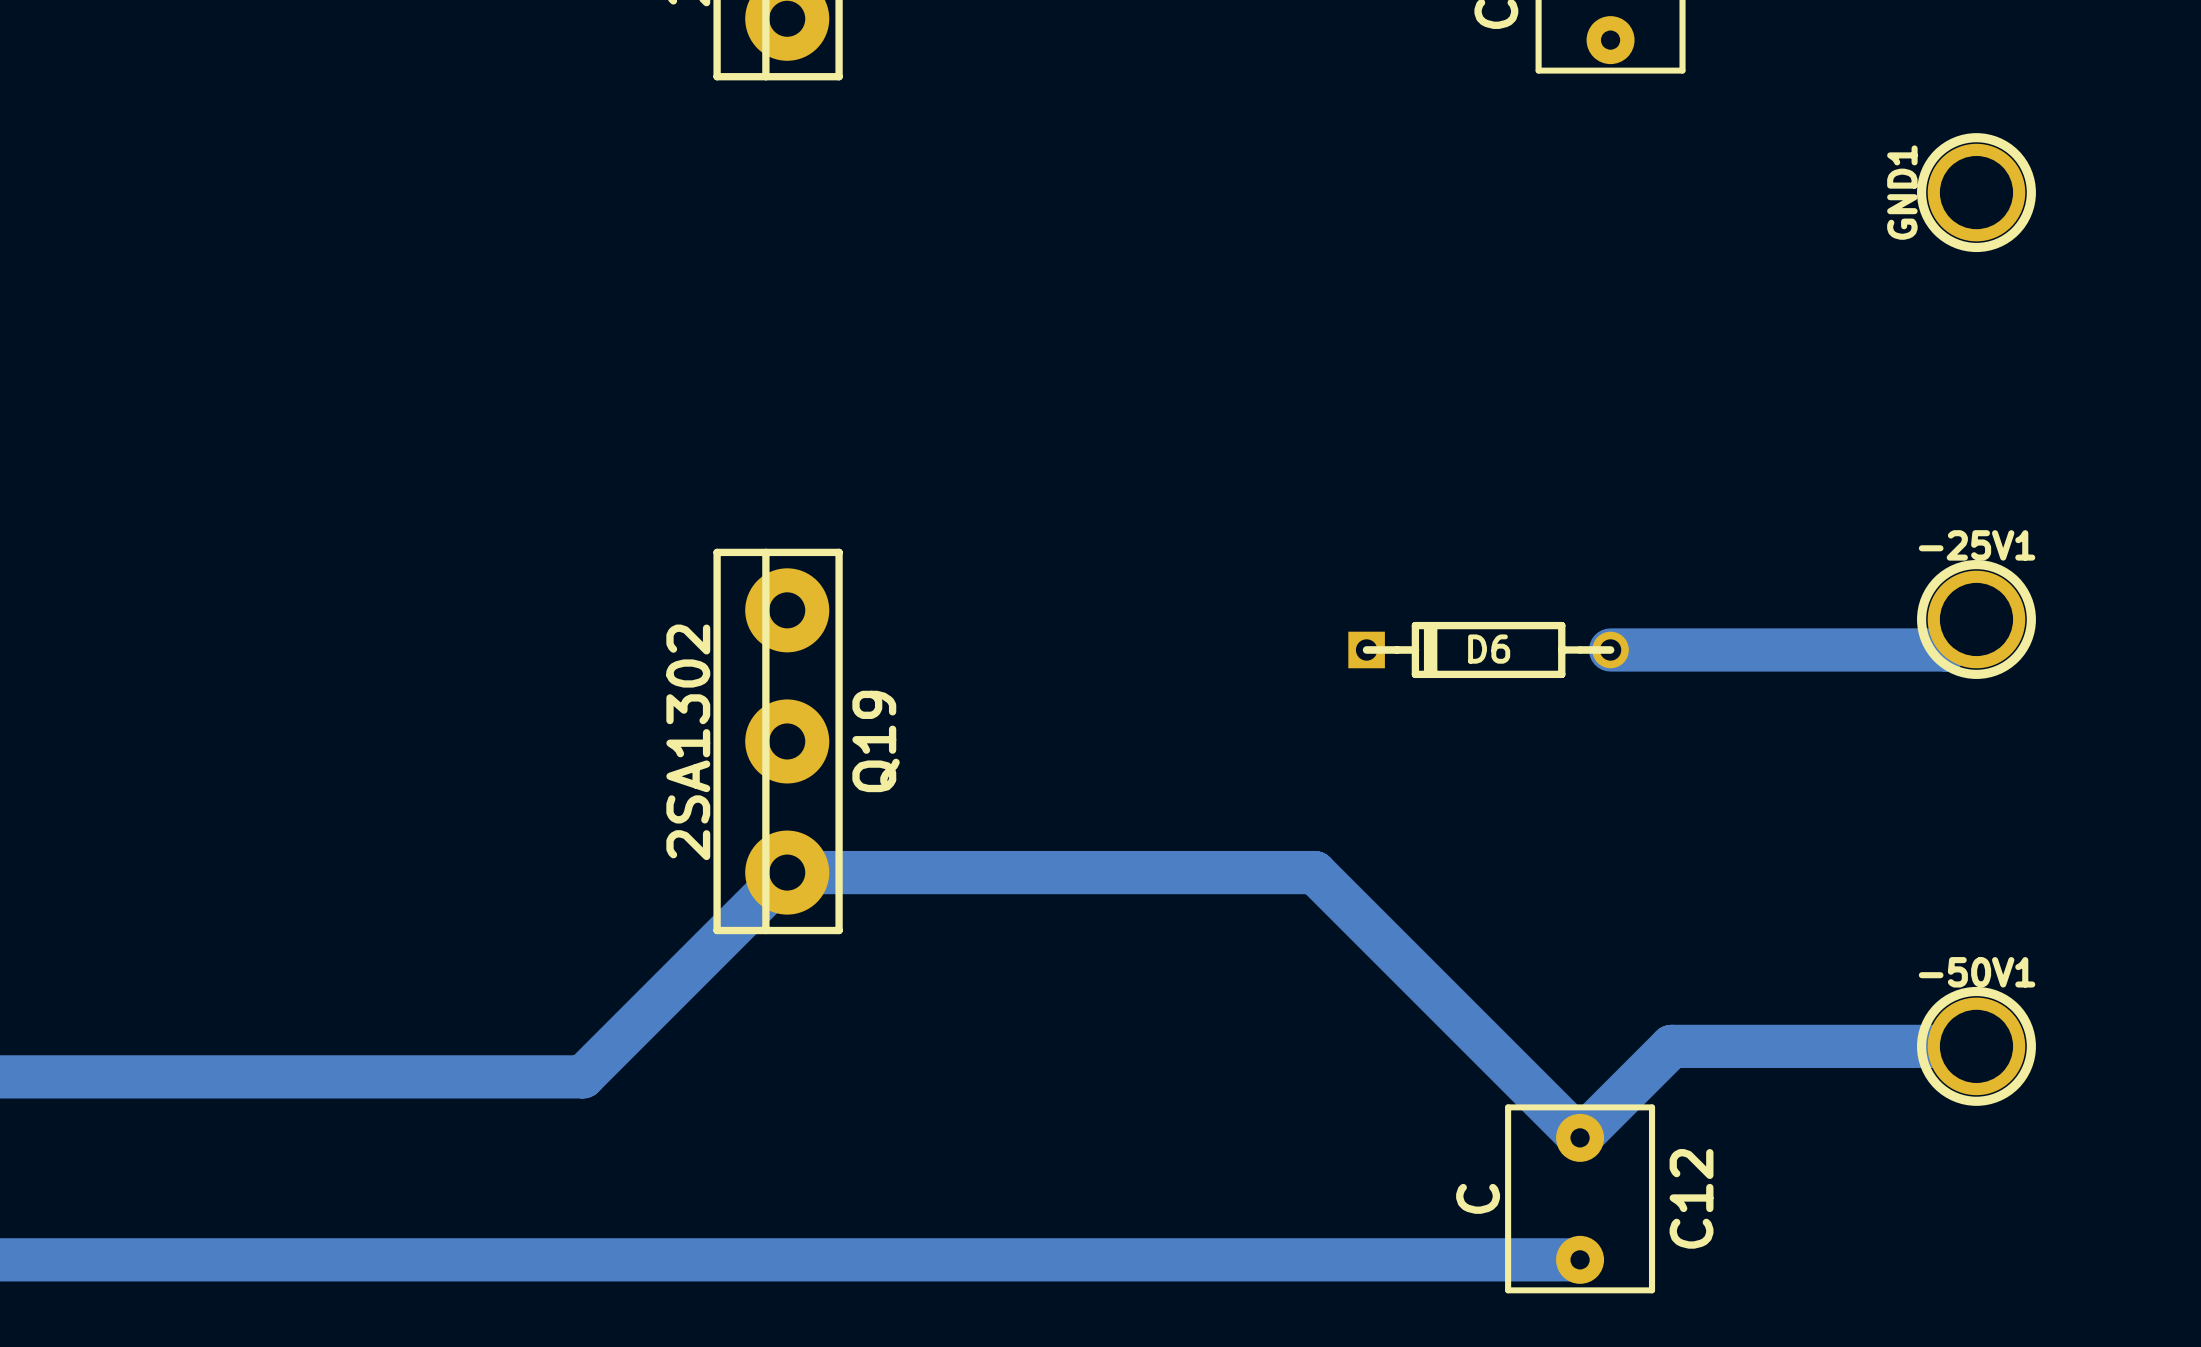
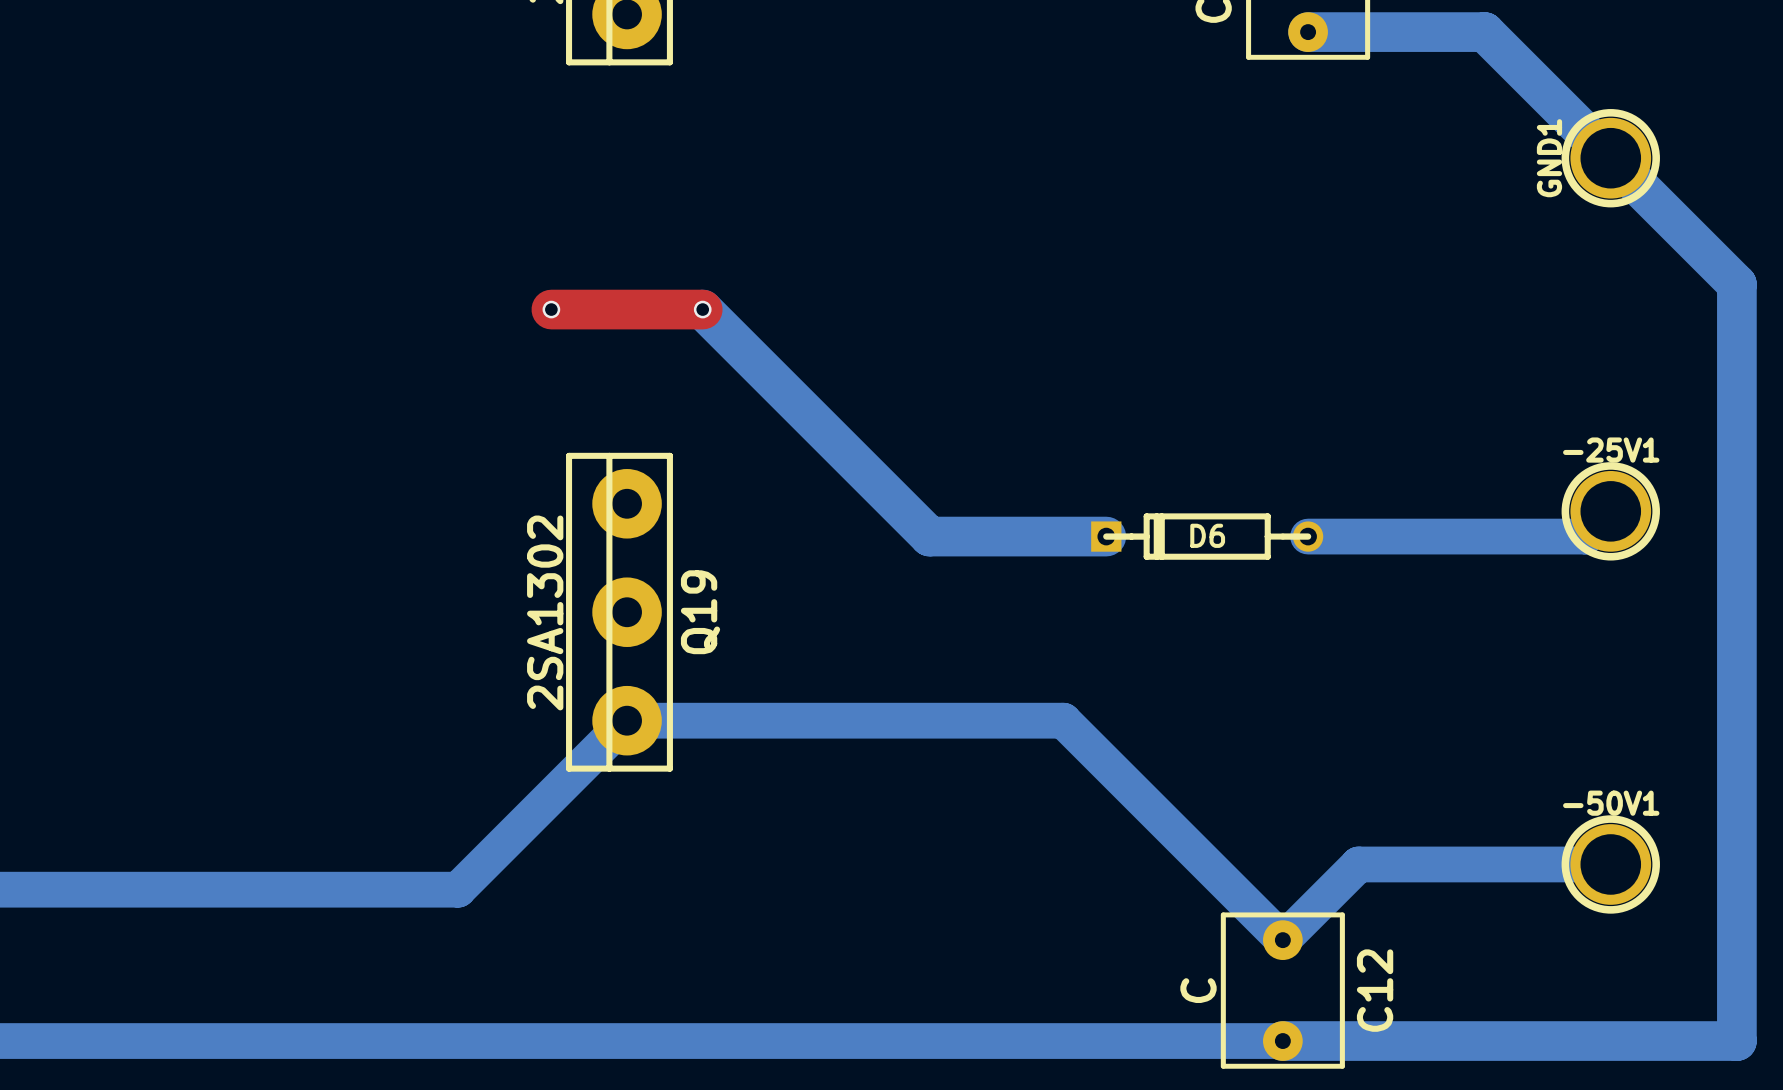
bottom track: none -> (1308, 32) (1484, 32) (1736, 284) (1736, 1041) (1282, 1041)
top track: none -> (551, 309) (702, 309)
via: none -> (551, 309)
bottom track: none -> (702, 309) (929, 536) (1106, 536)
via: none -> (702, 309)

